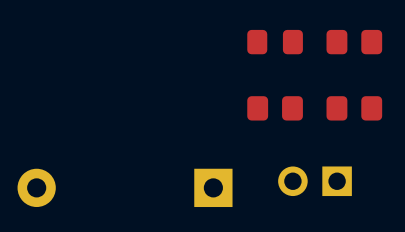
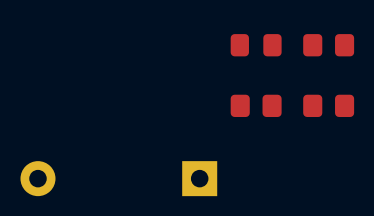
part: (315, 181) -> none

